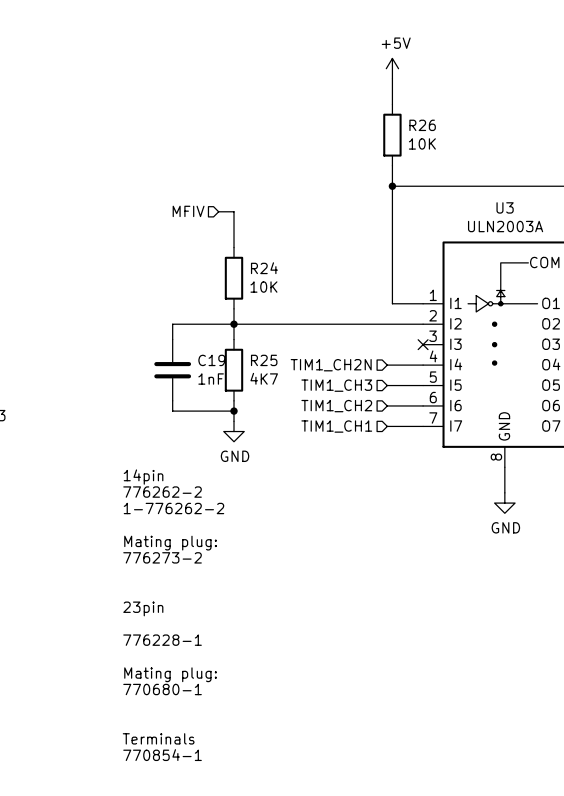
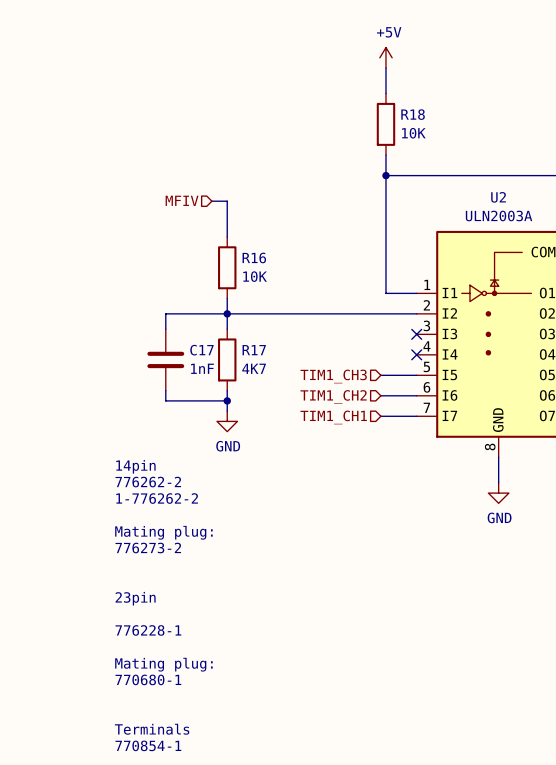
R26 name: R26 (422, 125) -> R18 (413, 114)
U3 name: U3 (505, 207) -> U2 (498, 197)
R24 name: R24 (264, 268) -> R16 (254, 257)
C19 name: C19 (211, 360) -> C17 (201, 350)
R25 name: R25 (264, 360) -> R17 (254, 350)
hierarchical label: TIM1_CH2N (331, 365) -> none
wire: (387, 365) (423, 365) -> none
no-connect mark: none -> (416, 354)

